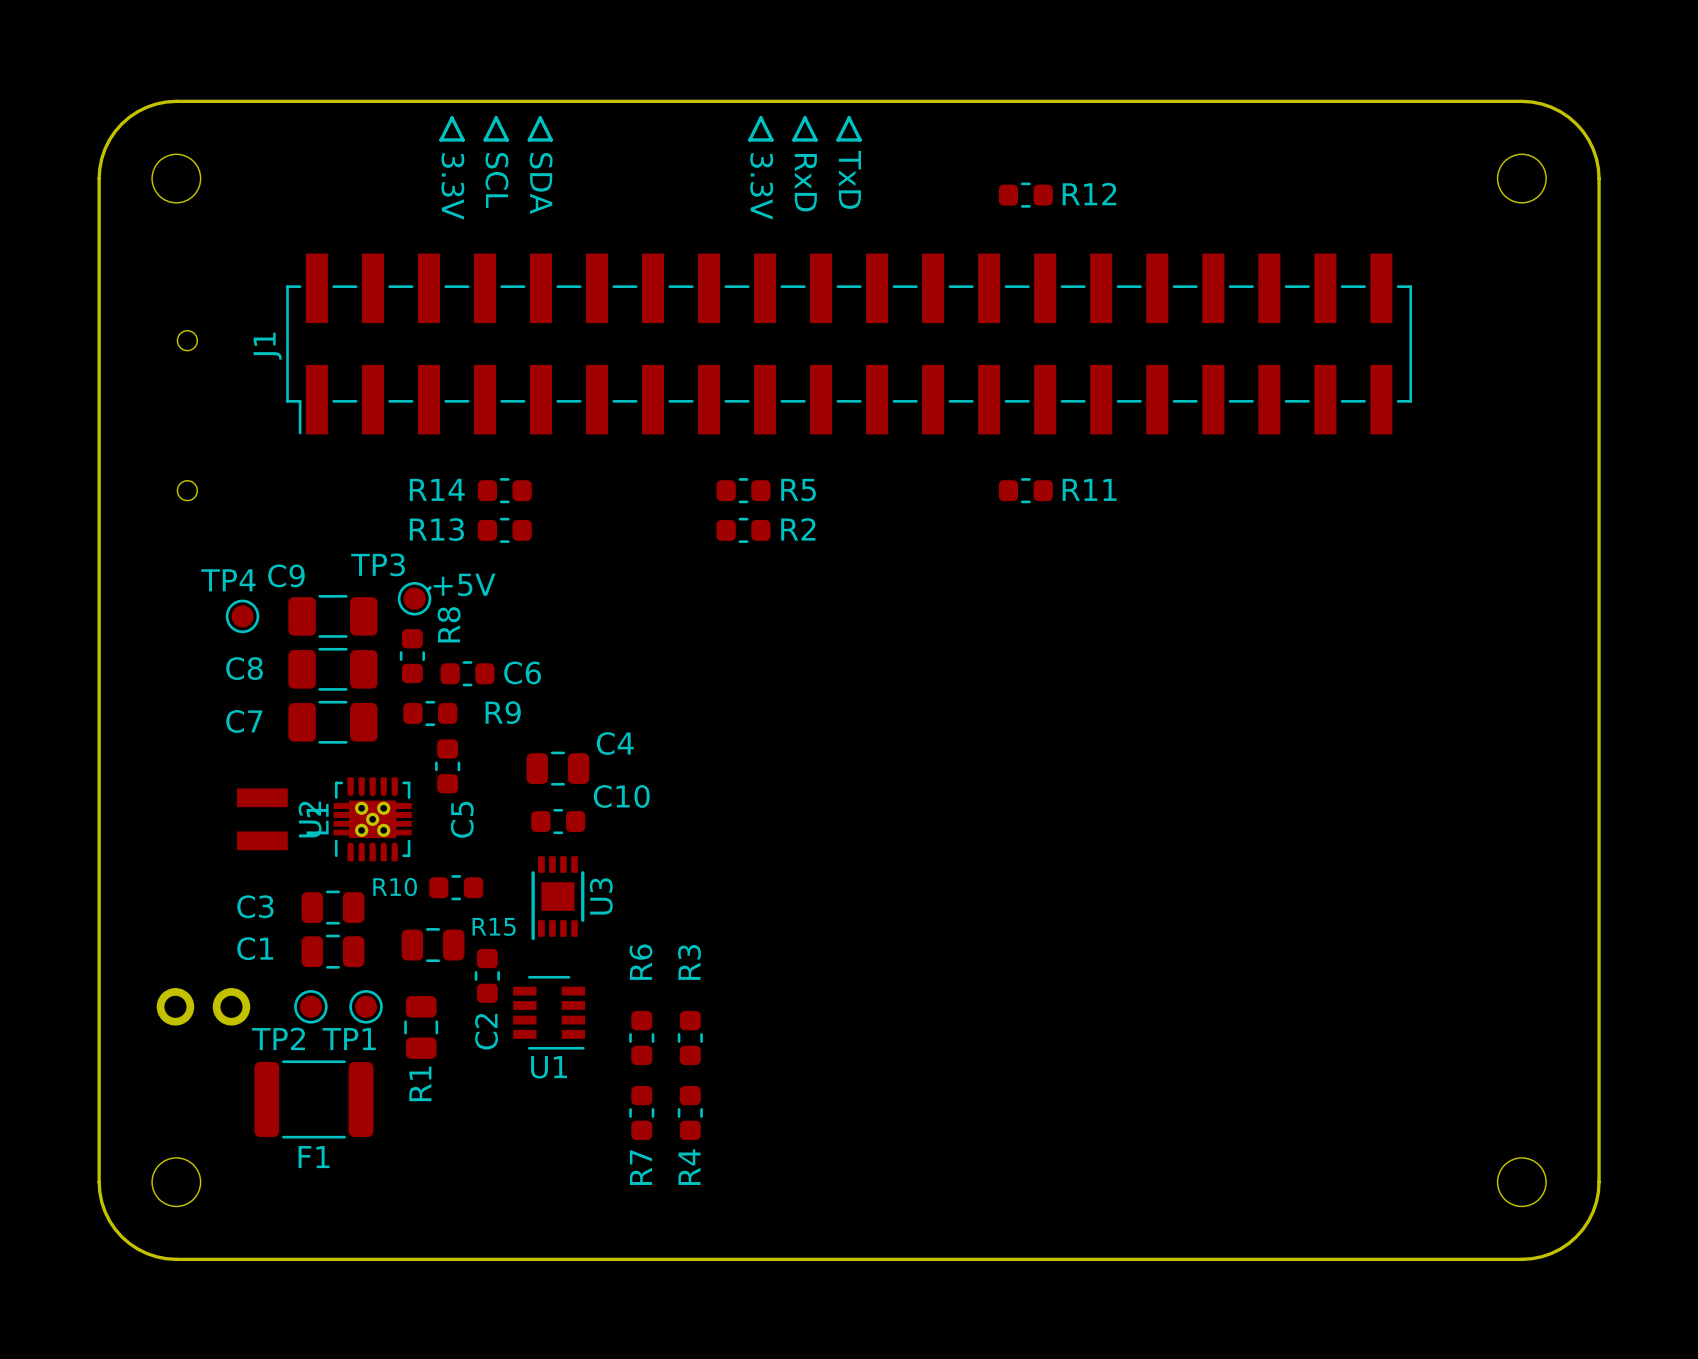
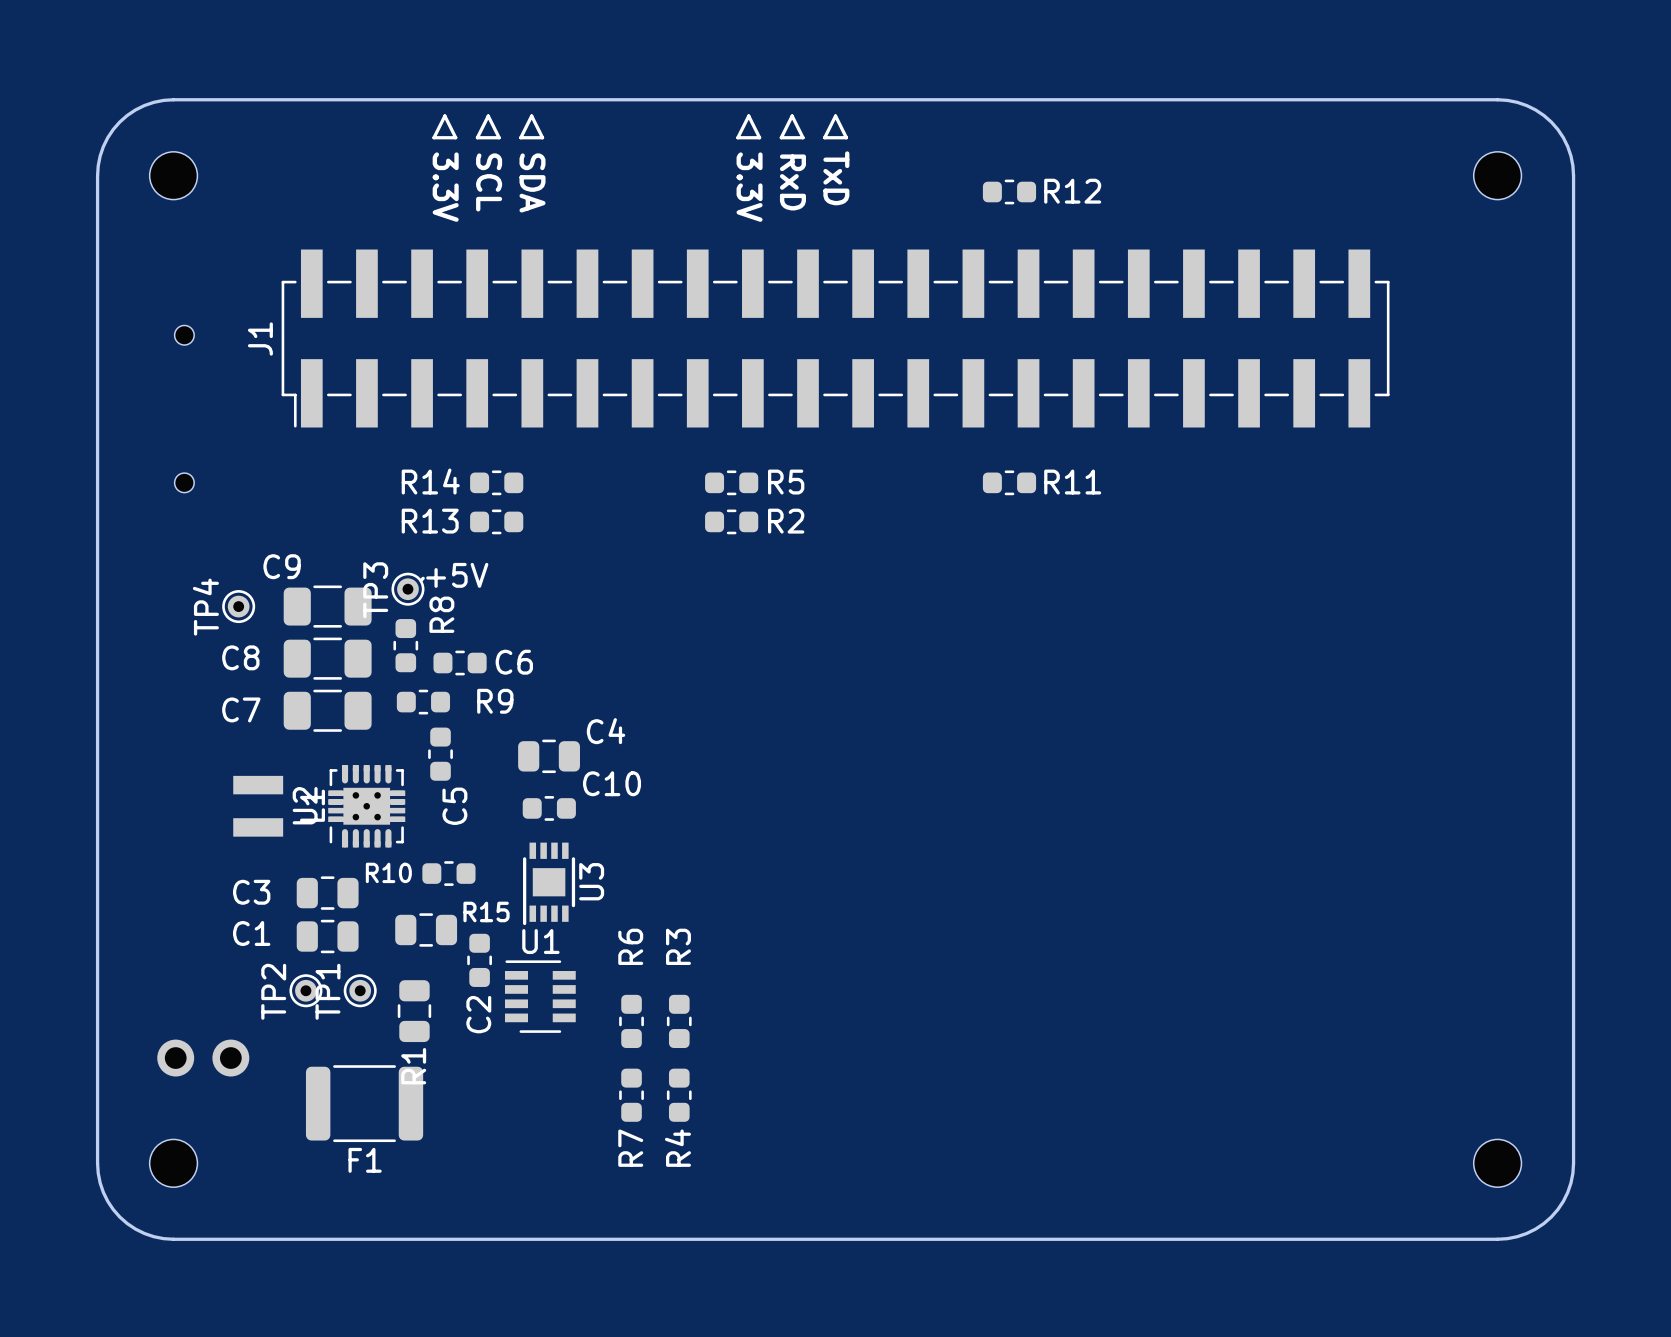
TP3 footprint: [397, 581, 432, 616] -> [391, 572, 425, 606]
TP4 footprint: [225, 599, 260, 634] -> [222, 590, 256, 624]
TP2 footprint: [294, 990, 328, 1024] -> [289, 974, 323, 1008]
TP1 footprint: [349, 990, 383, 1024] -> [343, 974, 377, 1008]
part position: (203, 1006) -> (203, 1058)
U1 rotation: 0° (549, 1012) -> 180° (540, 996)
F1 position: (313, 1099) -> (364, 1103)

